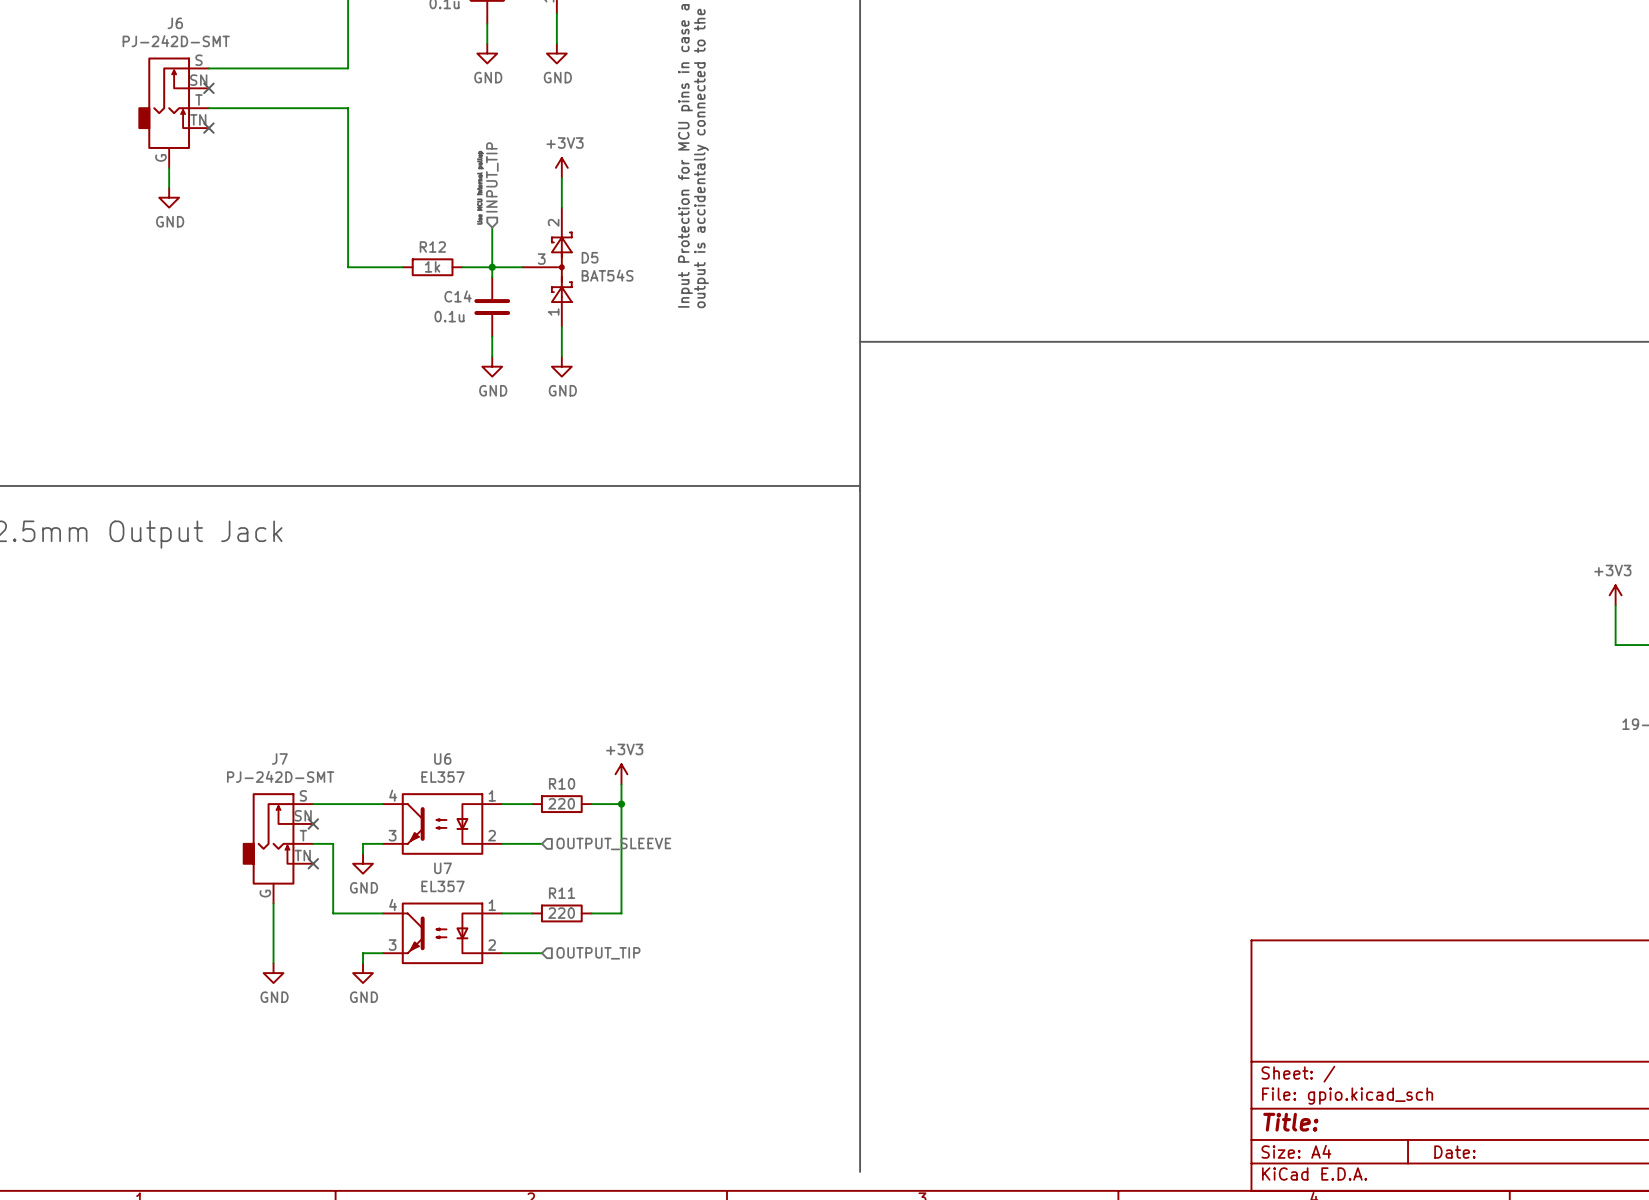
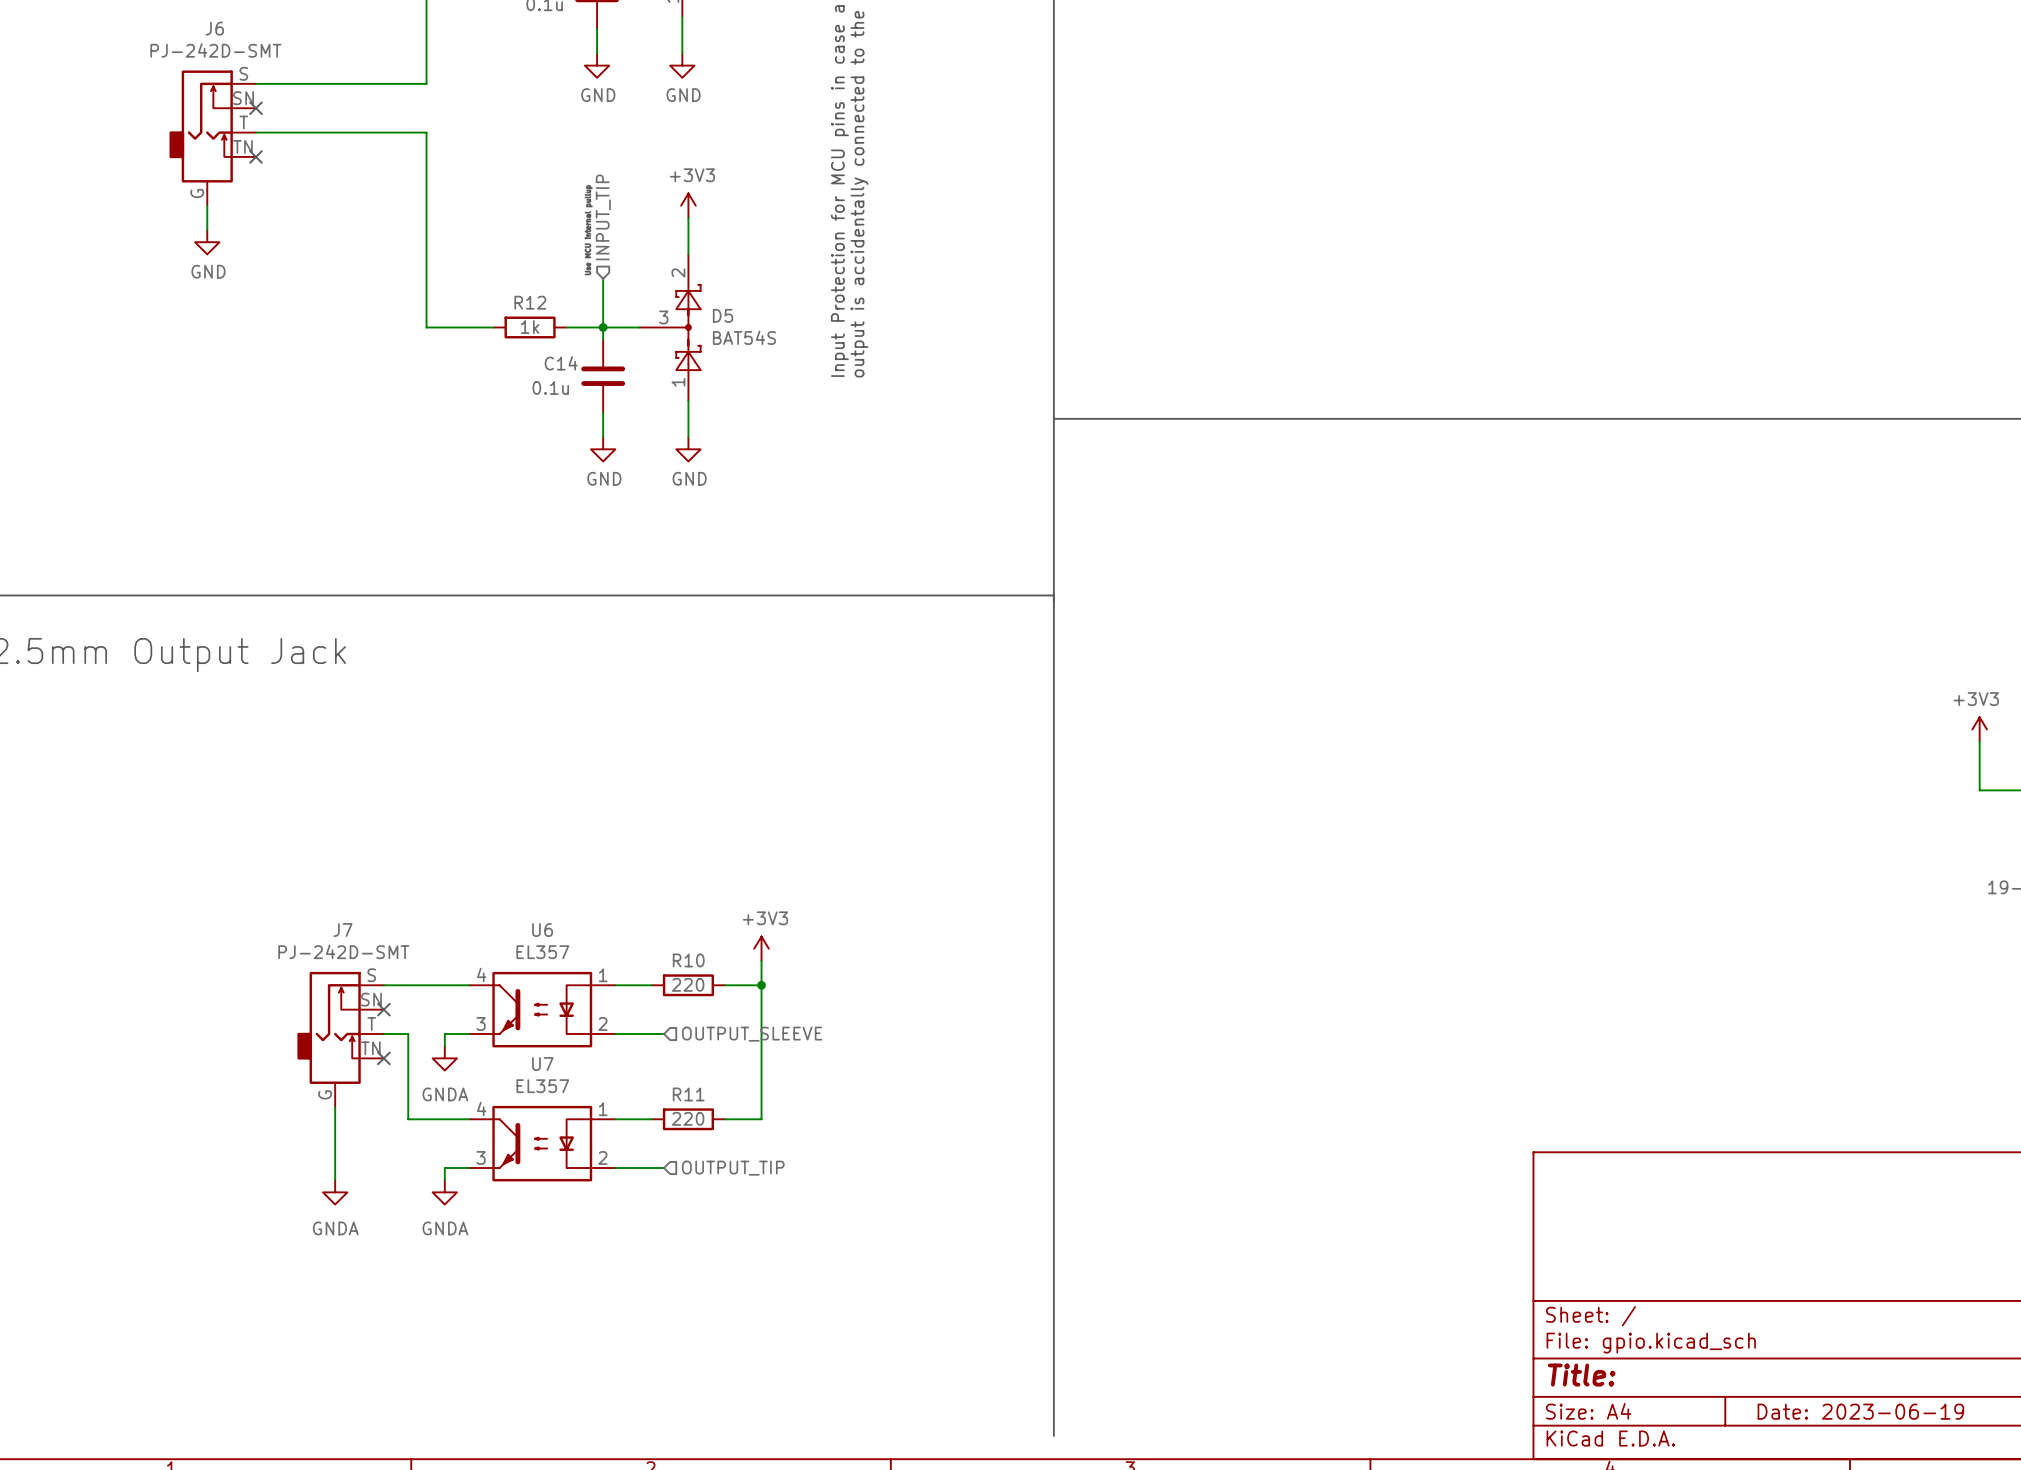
power symbol: GND (363, 863) -> GNDA (444, 1058)
power symbol: GND (273, 973) -> GNDA (335, 1192)
power symbol: GND (363, 973) -> GNDA (444, 1192)
title block: Date: (1454, 1152) -> Date: 2023-06-19 (1860, 1411)

